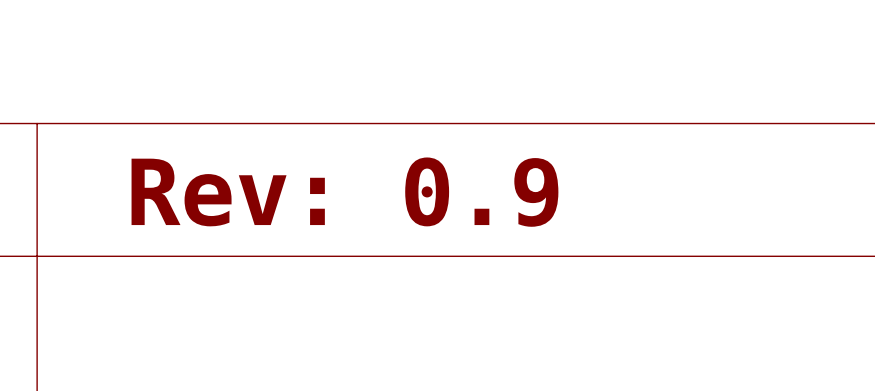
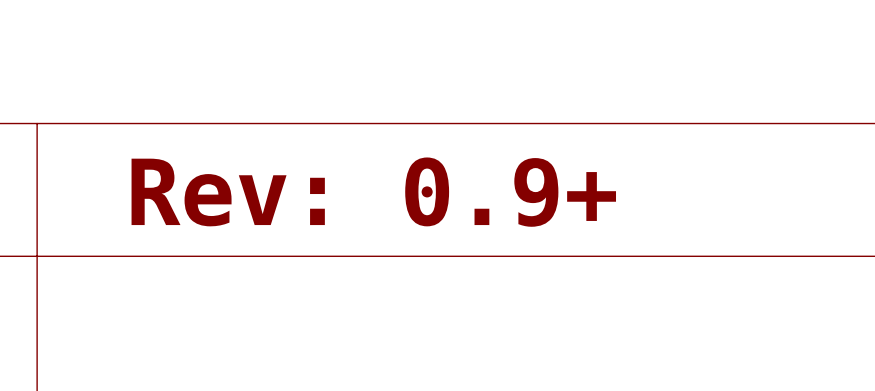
title block: Rev: 0.9 (344, 192) -> Rev: 0.9+ (373, 192)

